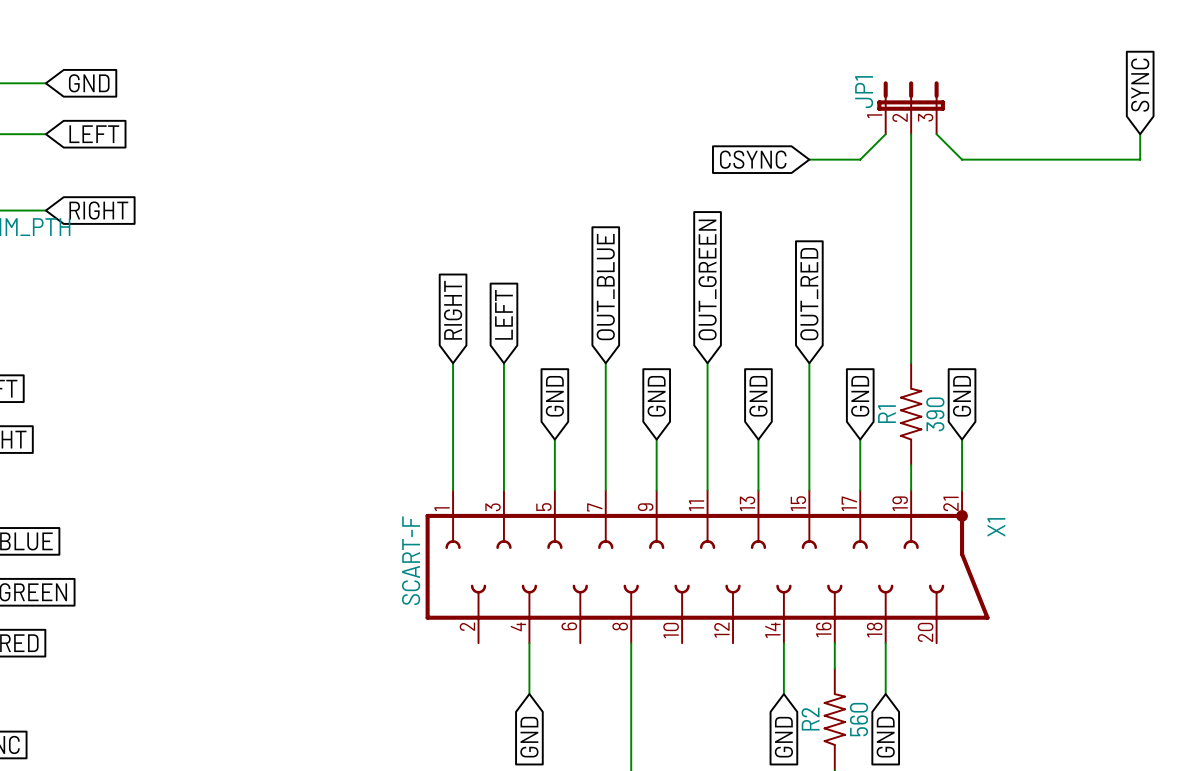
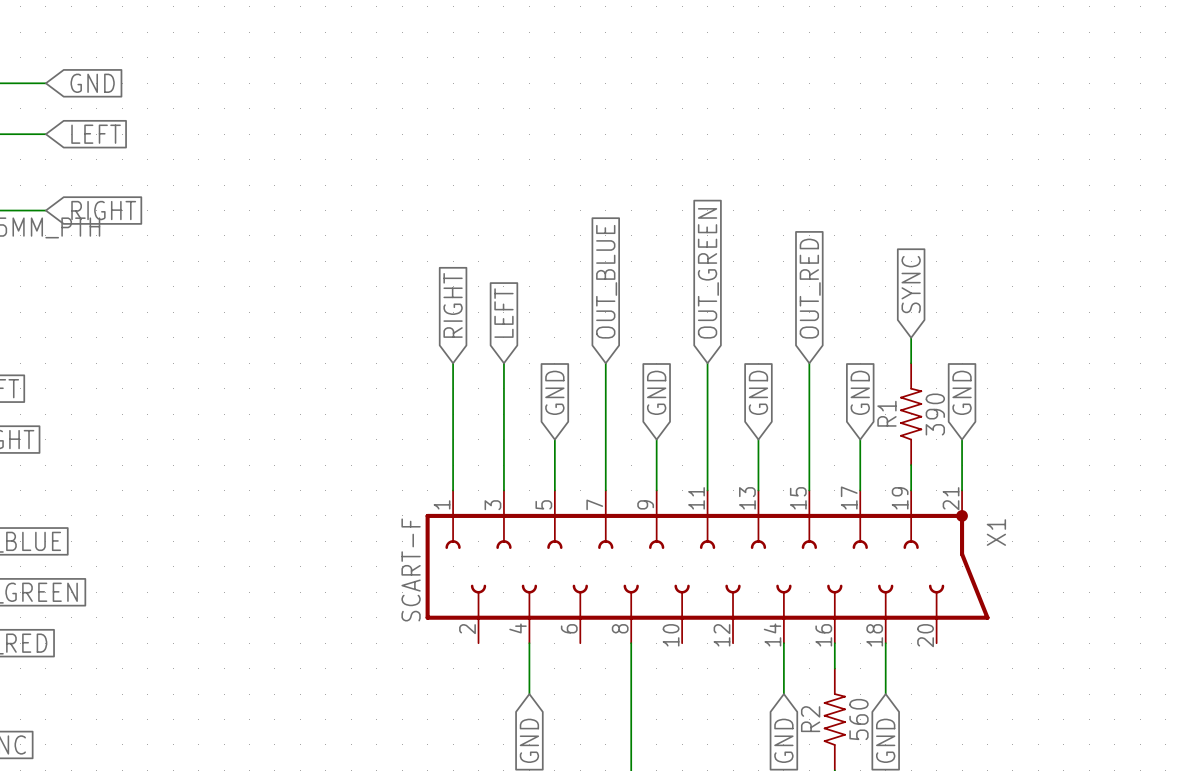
global label: SYNC (1140, 85) -> none
JP1: (911, 107) -> none
wire: (885, 134) (860, 159) (809, 159) -> none
wire: (911, 134) (911, 337) -> none
wire: (936, 134) (962, 159) (1140, 159) (1140, 134) -> none
global label: CSYNC (753, 159) -> none
global label: none -> SYNC (911, 284)

